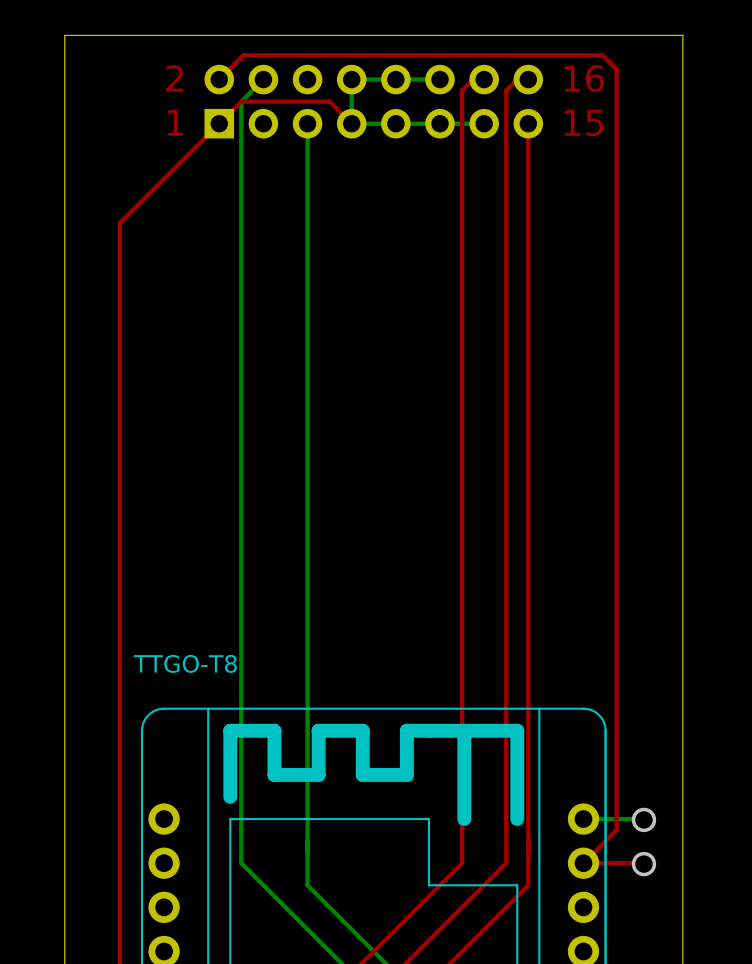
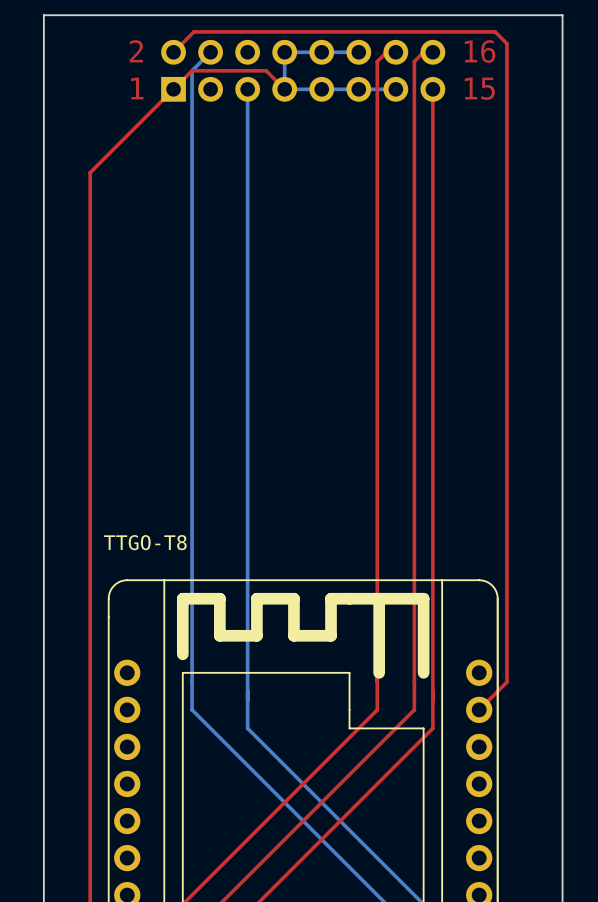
bottom track: (583, 819) (643, 819) -> none
via: (643, 819) -> none
top track: (583, 863) (643, 864) -> none
via: (643, 864) -> none

